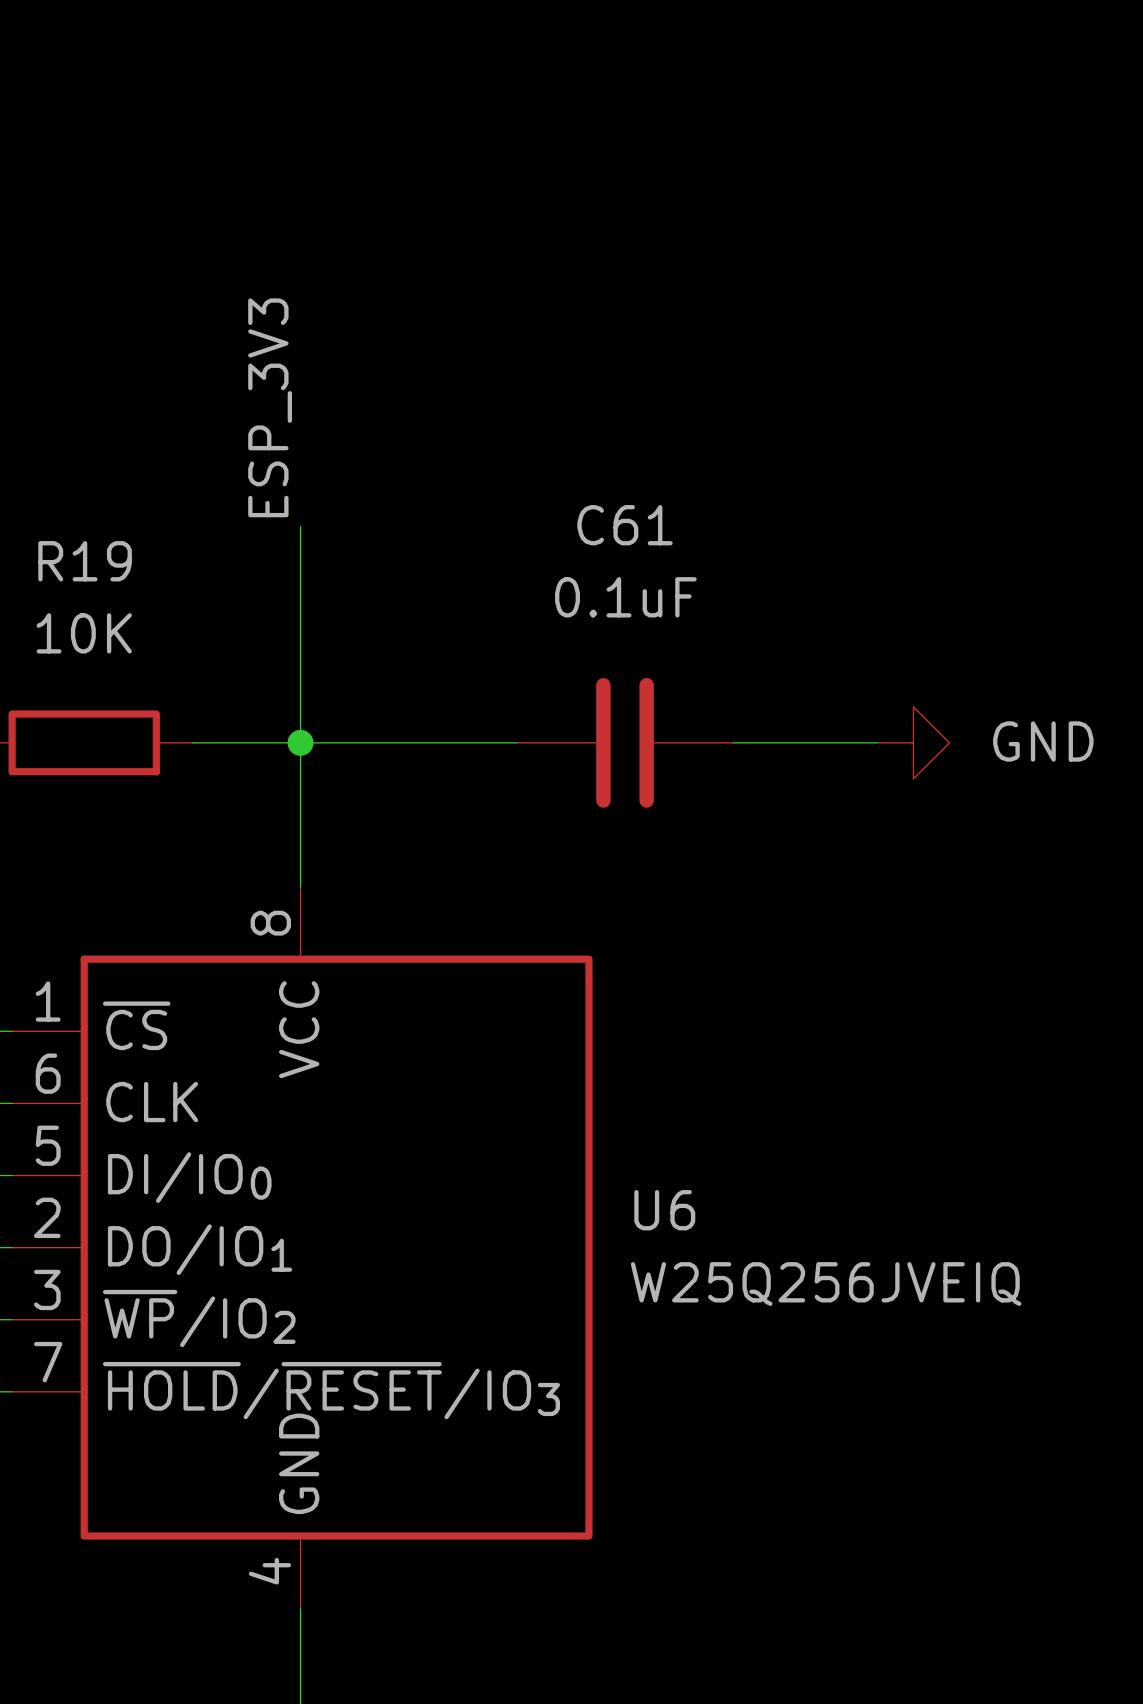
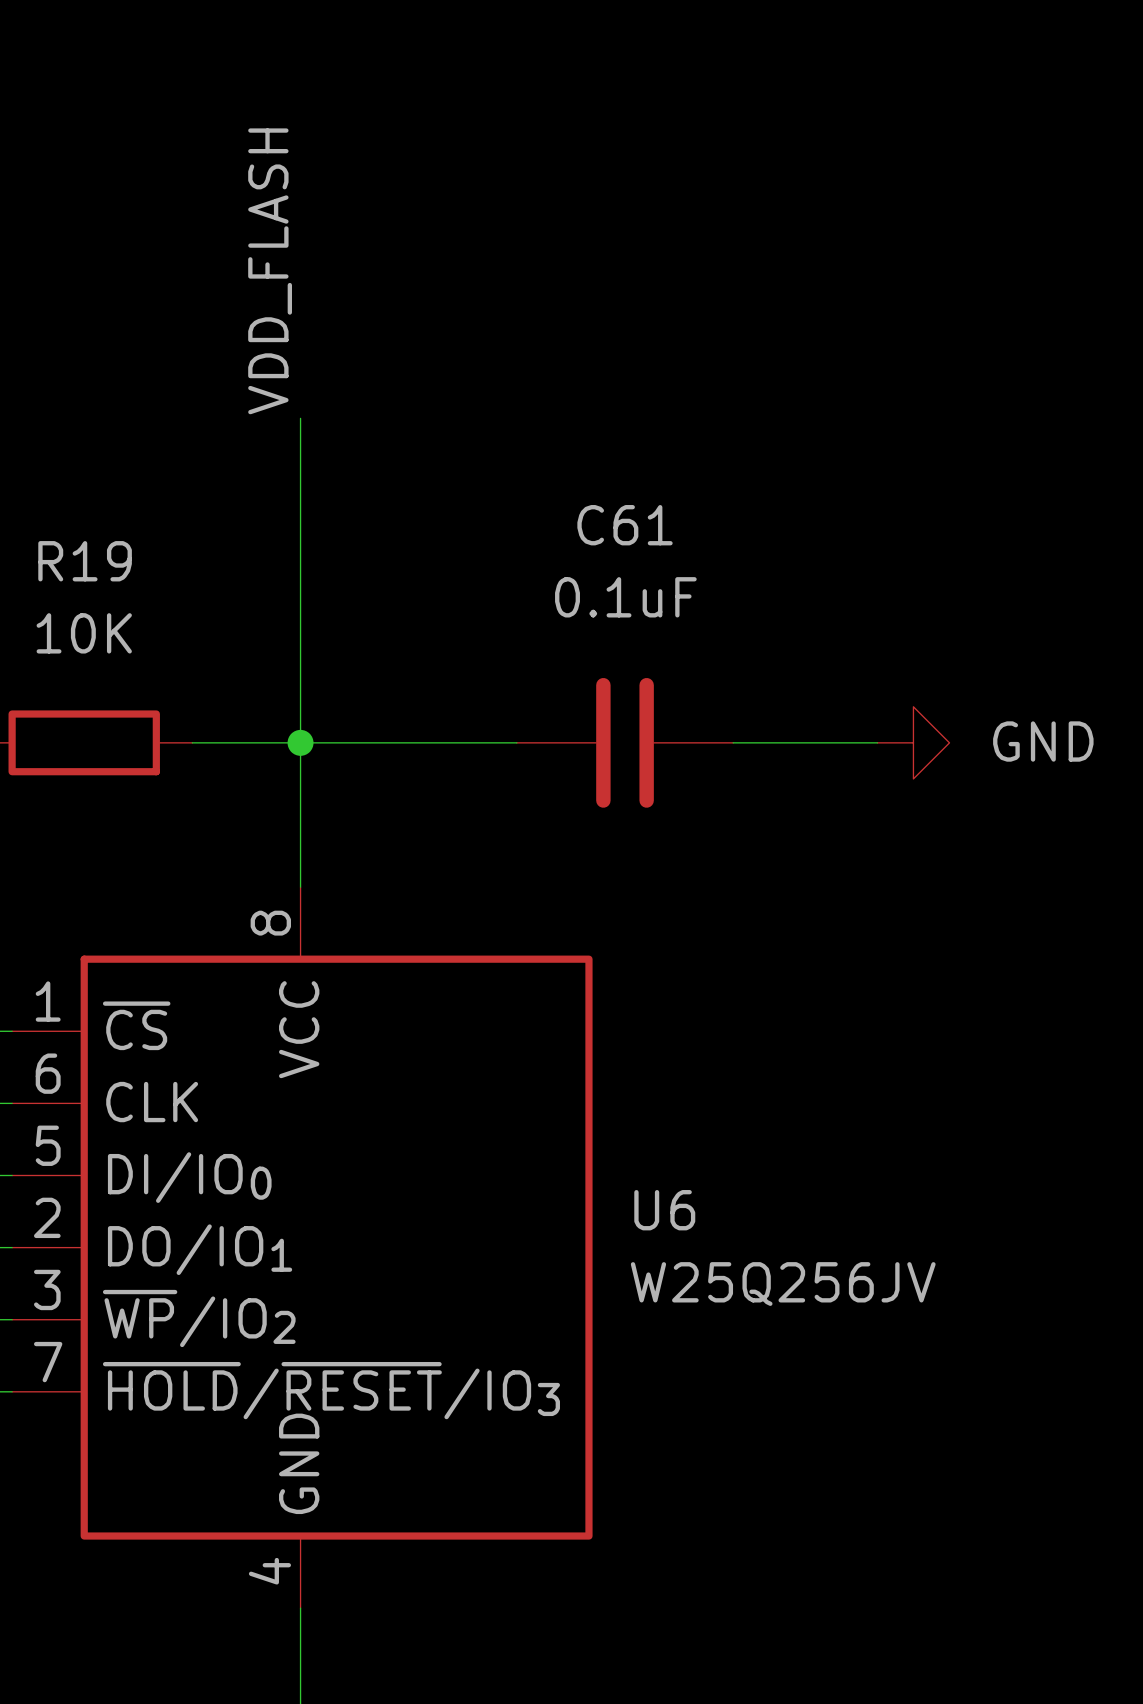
label: none -> VDD_FLASH (270, 271)
label: ESP_3V3 (270, 407) -> none
wire: none -> (300, 418) (300, 526)
U6 value: W25Q256JVEIQ (826, 1284) -> W25Q256JV (783, 1284)

